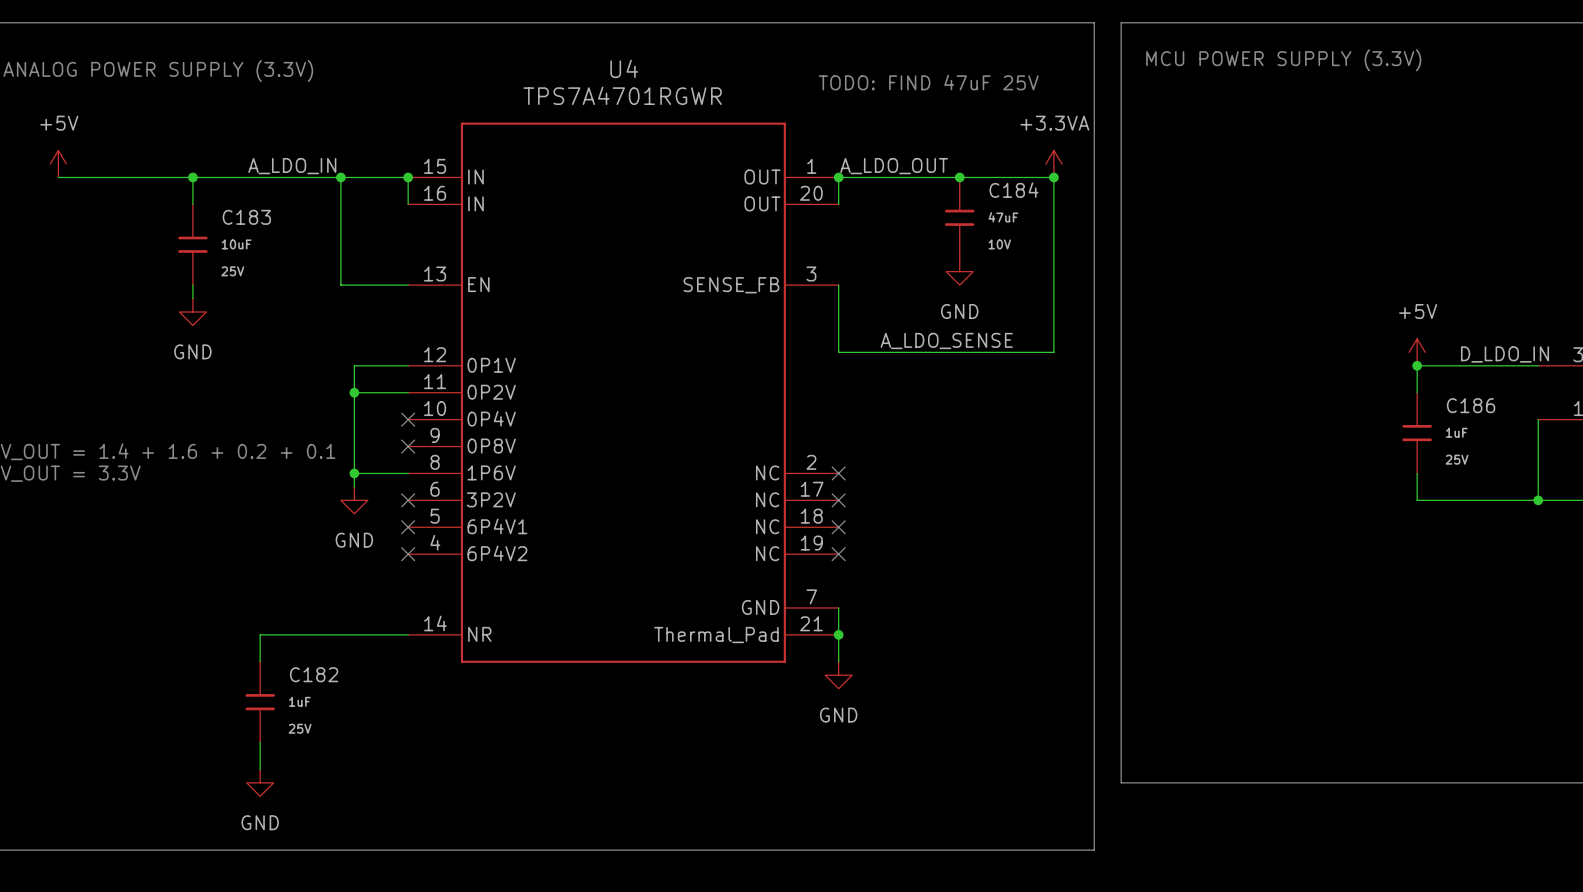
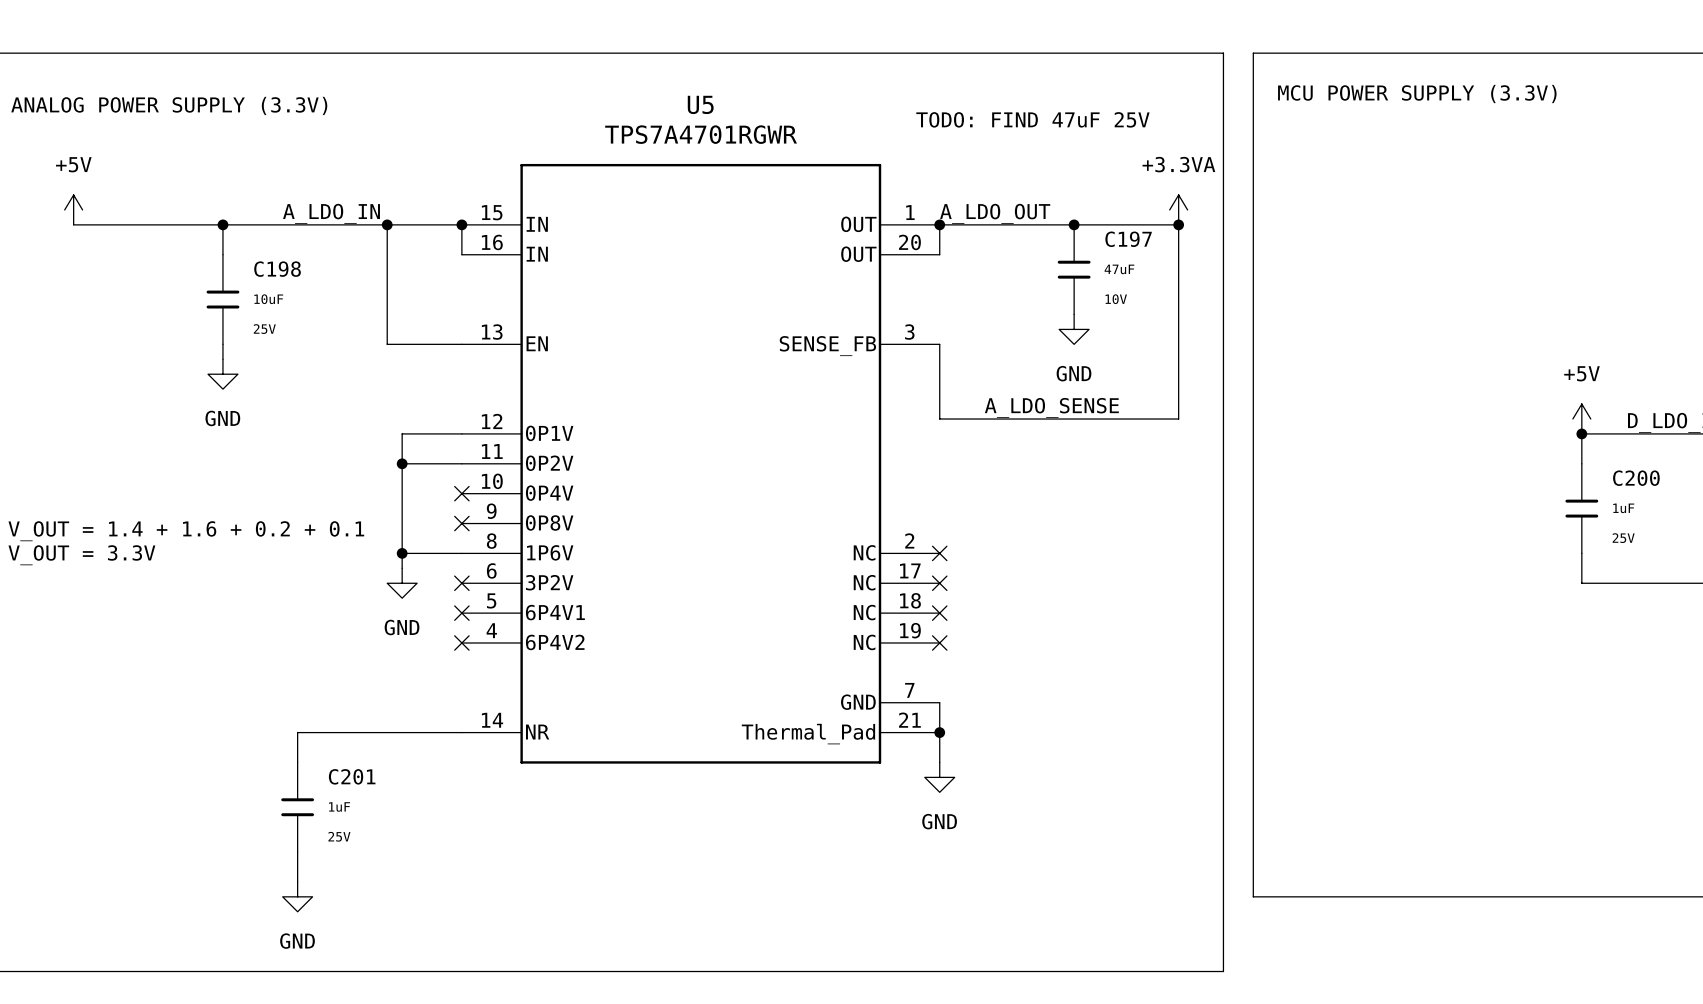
U4 name: U4 (624, 68) -> U5 (700, 104)
C184 name: C184 (1013, 190) -> C197 (1128, 239)
C183 name: C183 (246, 217) -> C198 (277, 269)
C186 name: C186 (1471, 405) -> C200 (1636, 478)
C182 name: C182 (314, 674) -> C201 (352, 776)

